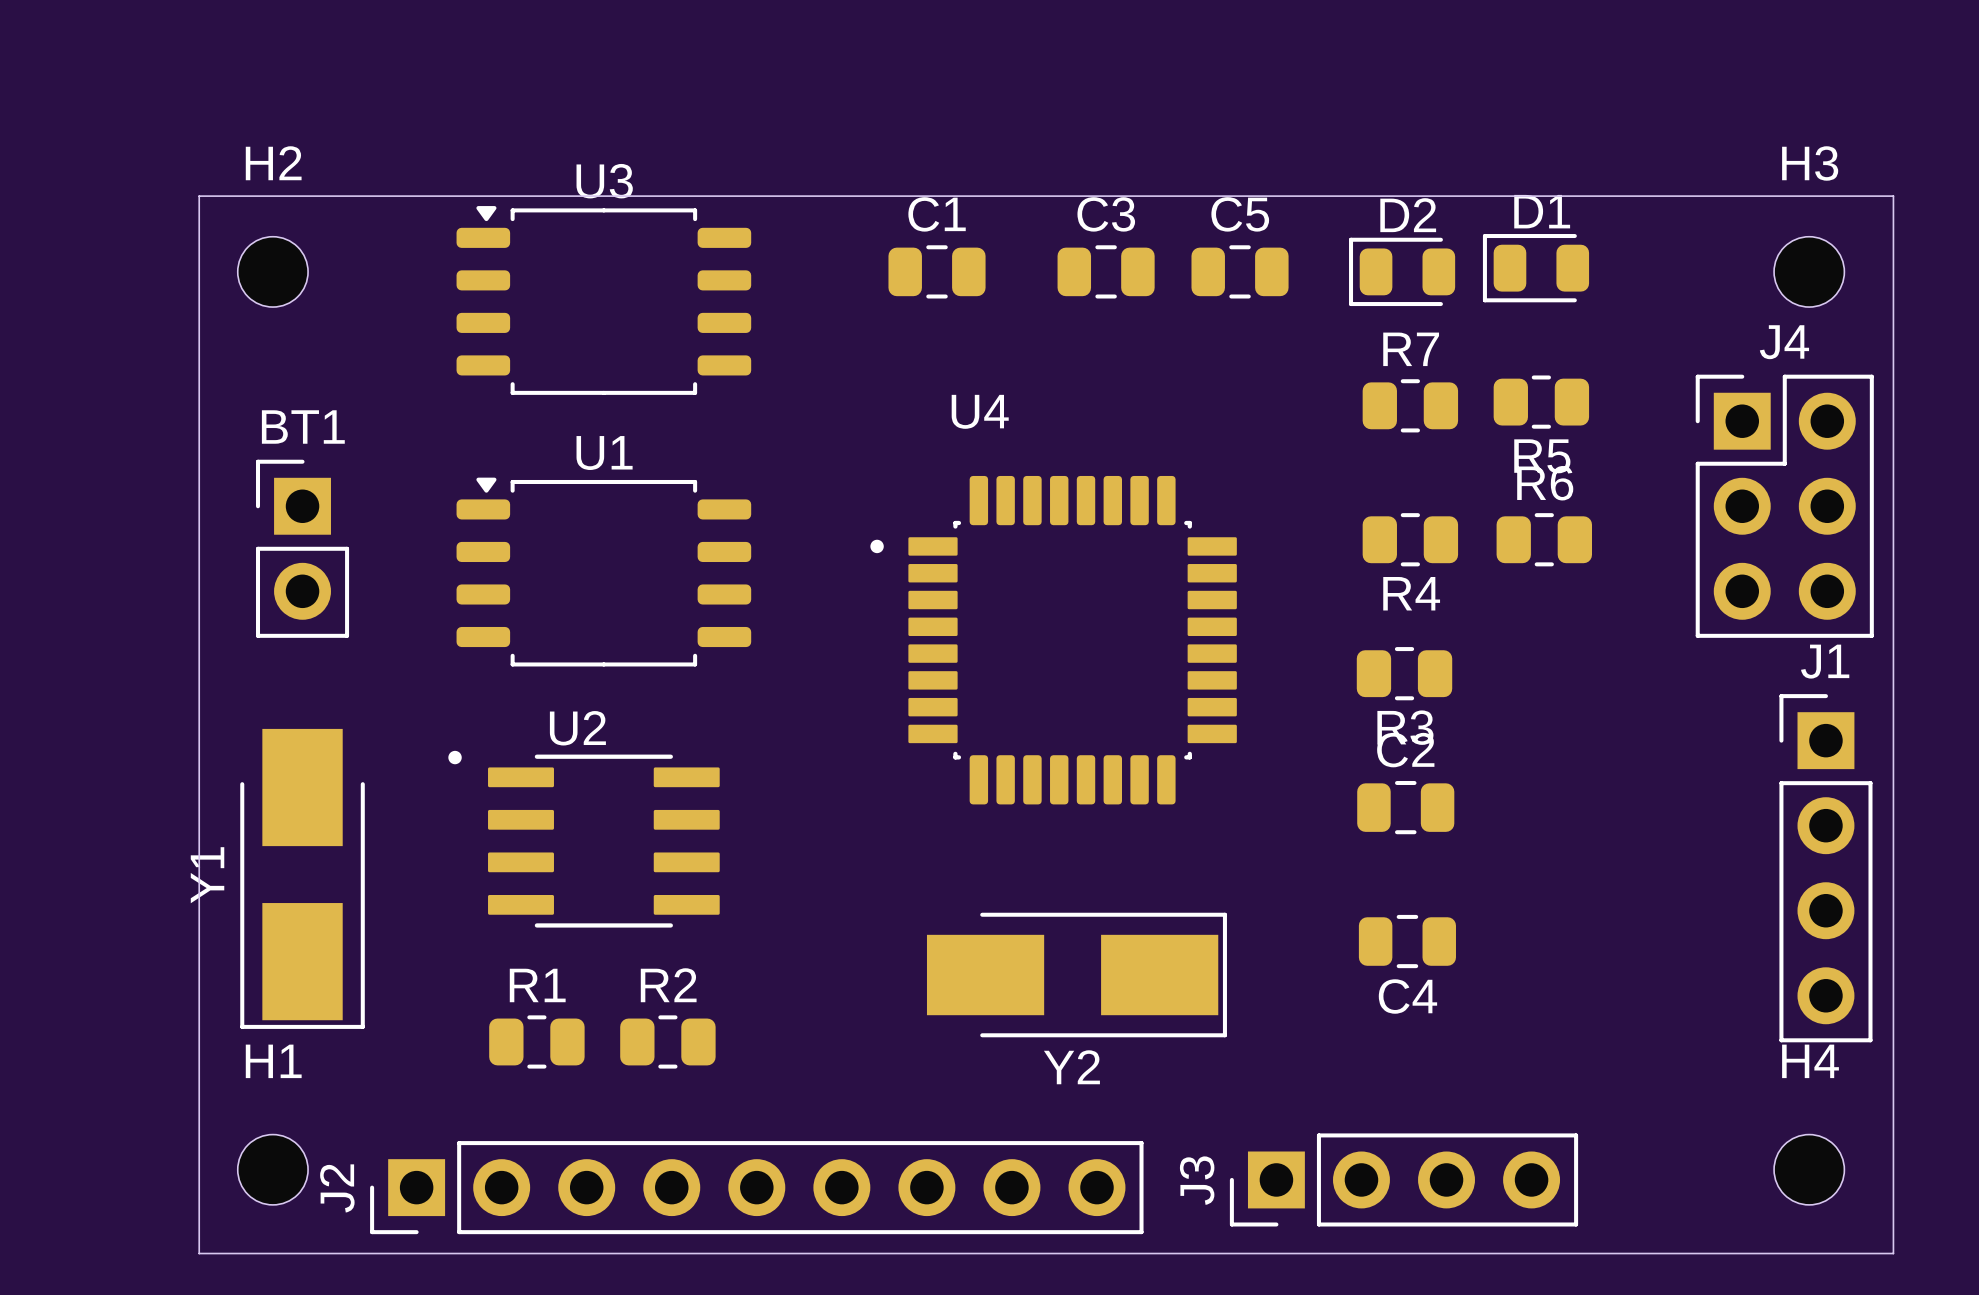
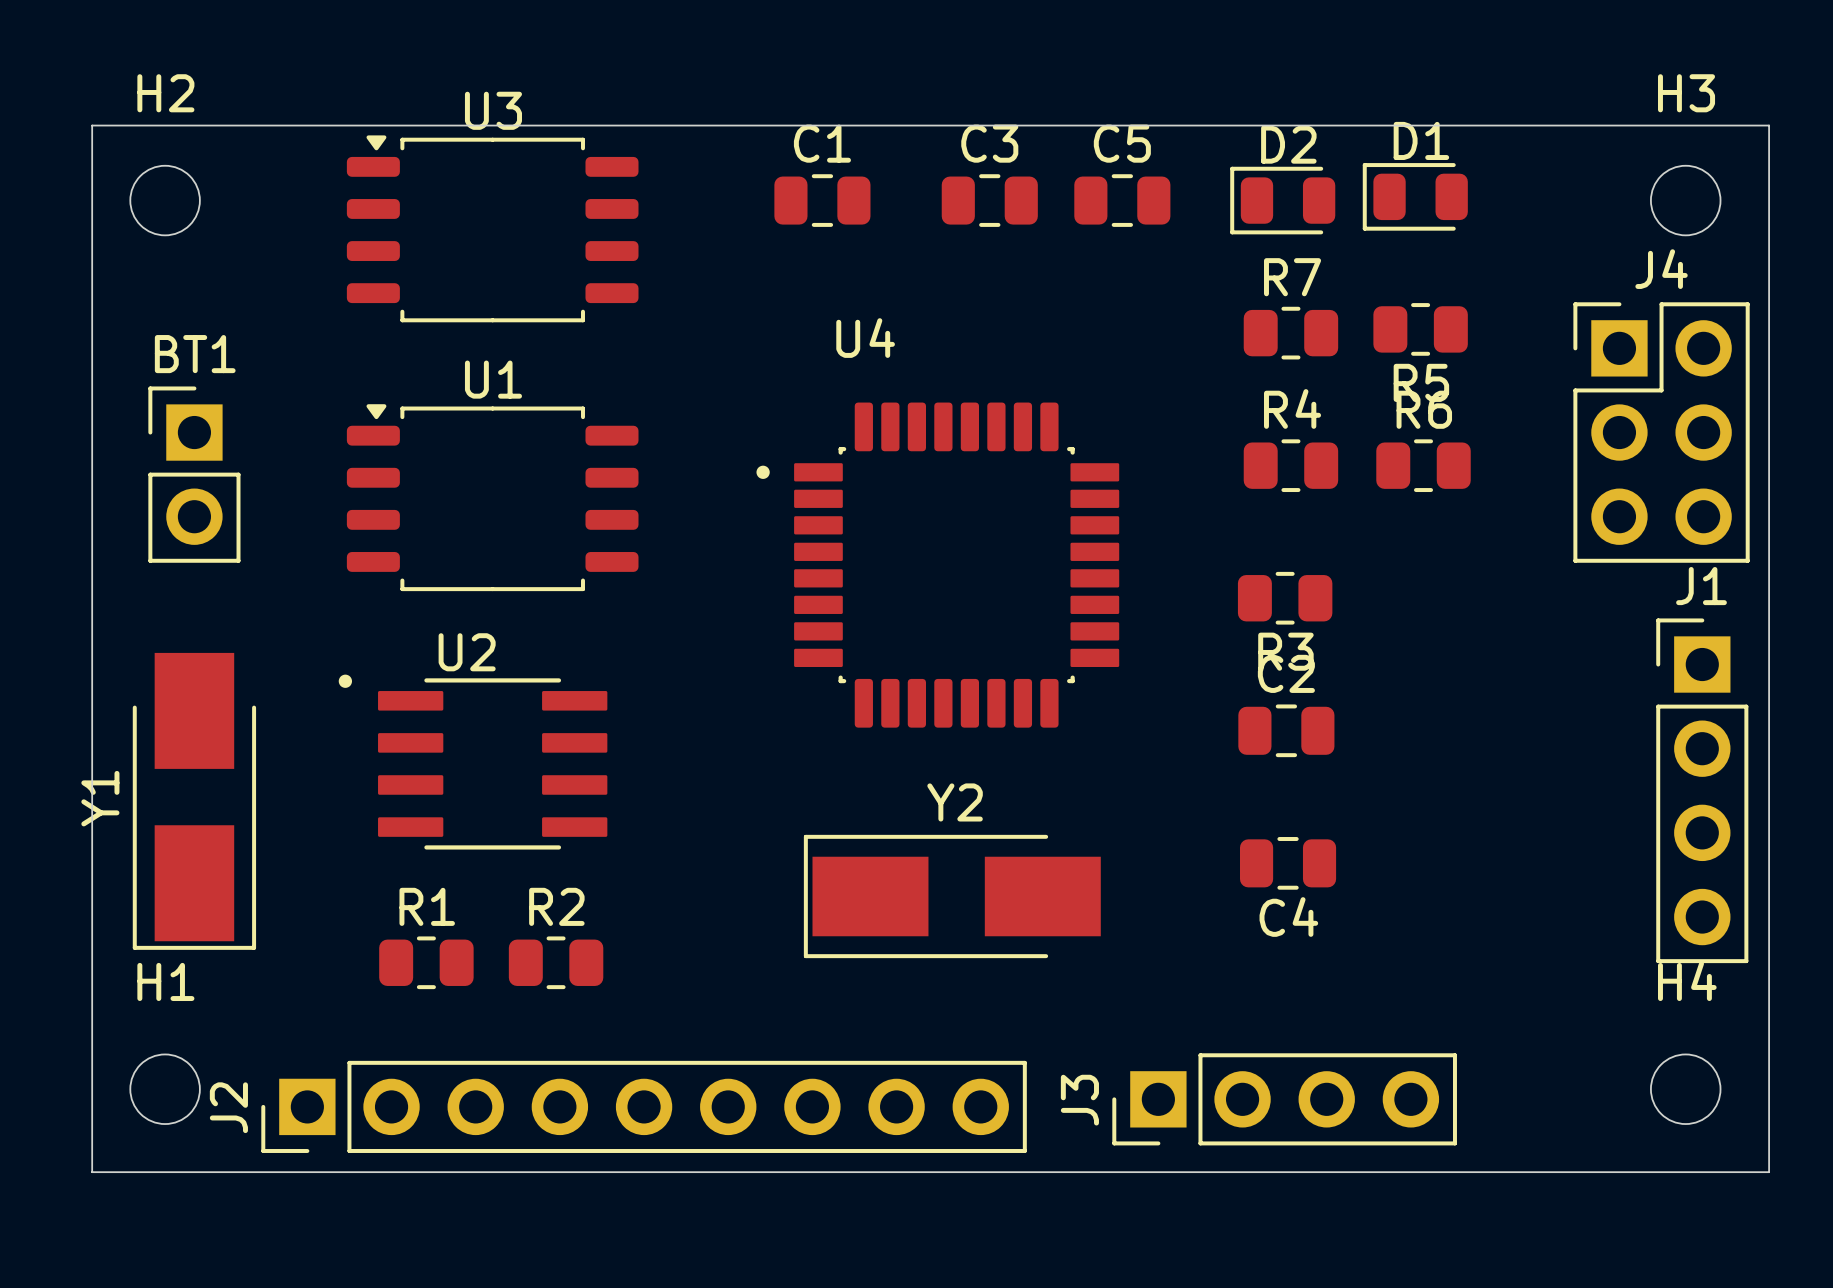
R4 name position: R4 (1411, 593) -> R4 (1292, 408)
Y2 rotation: 0° (1076, 975) -> 180° (952, 896)

